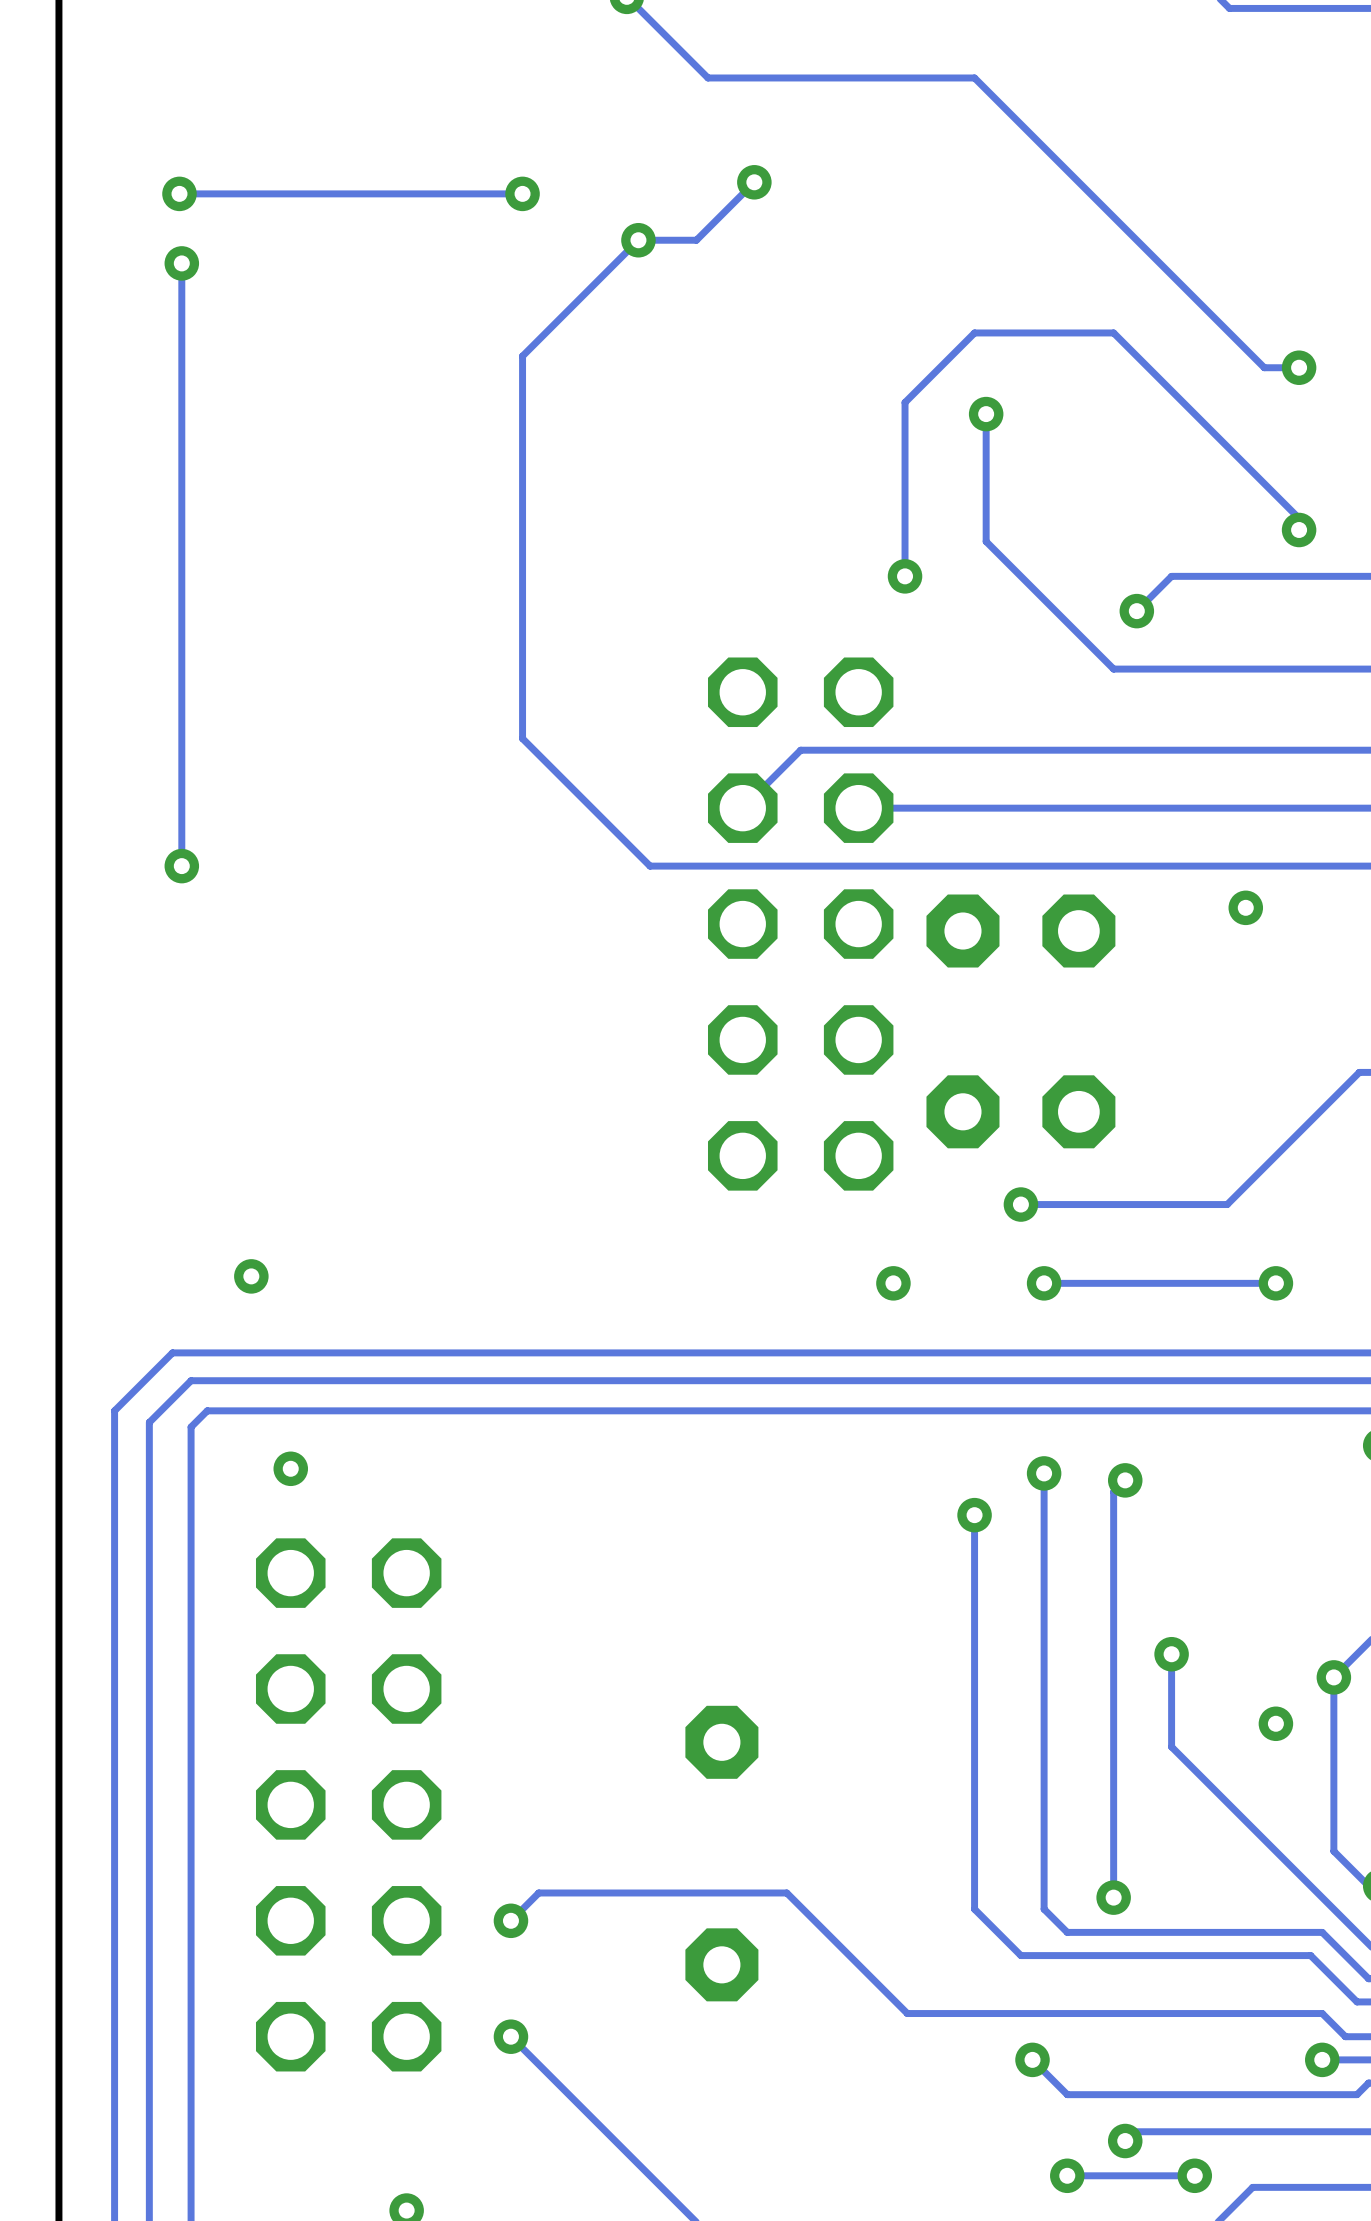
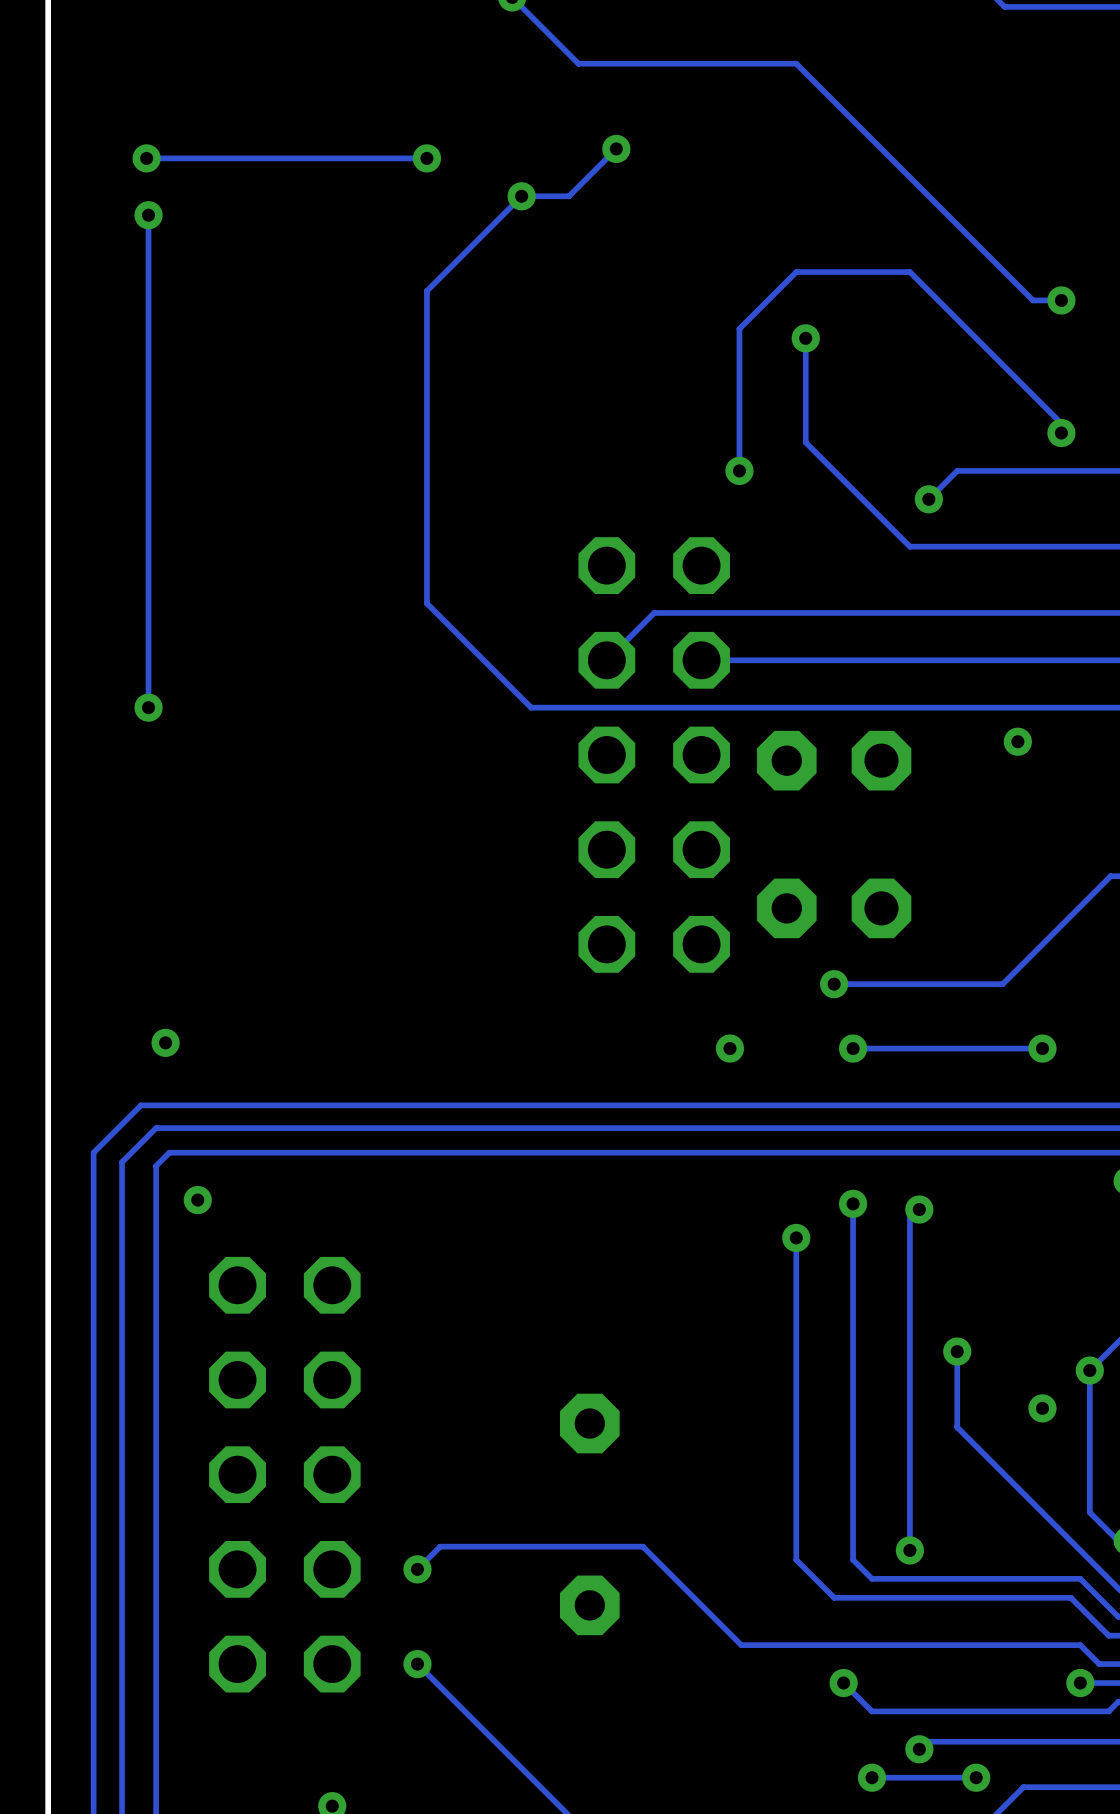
via position: (251, 1276) -> (165, 1042)
via position: (290, 1468) -> (197, 1200)

